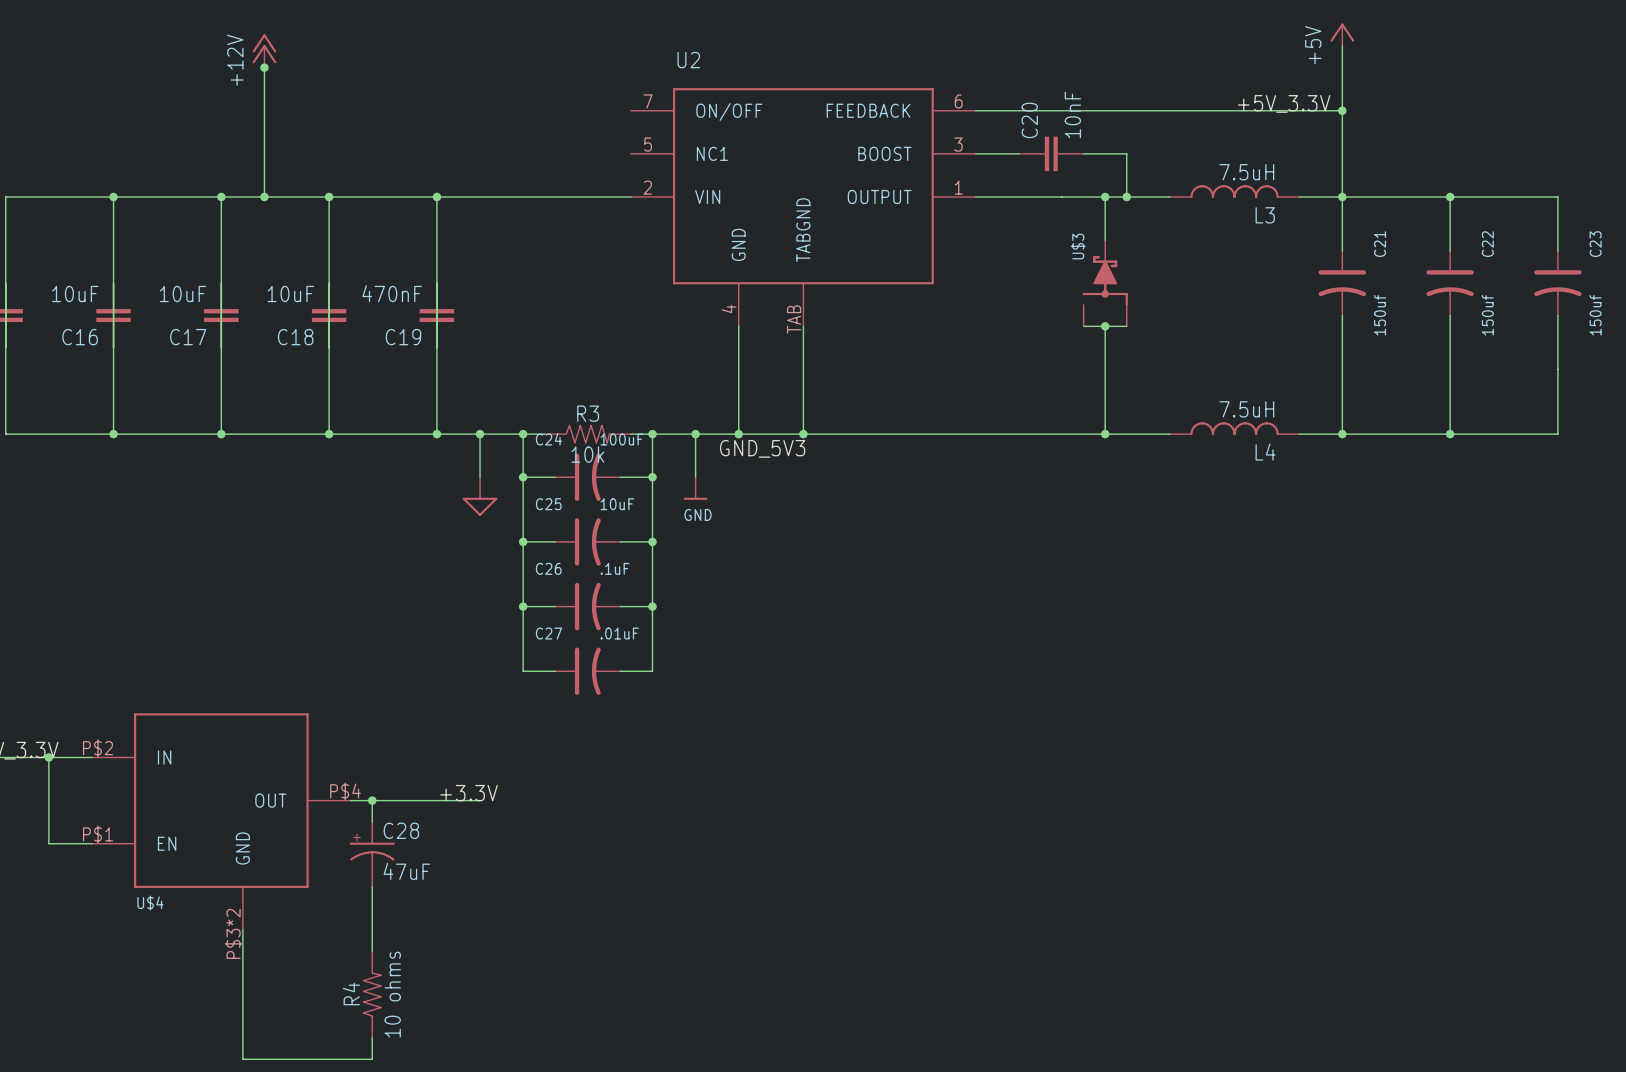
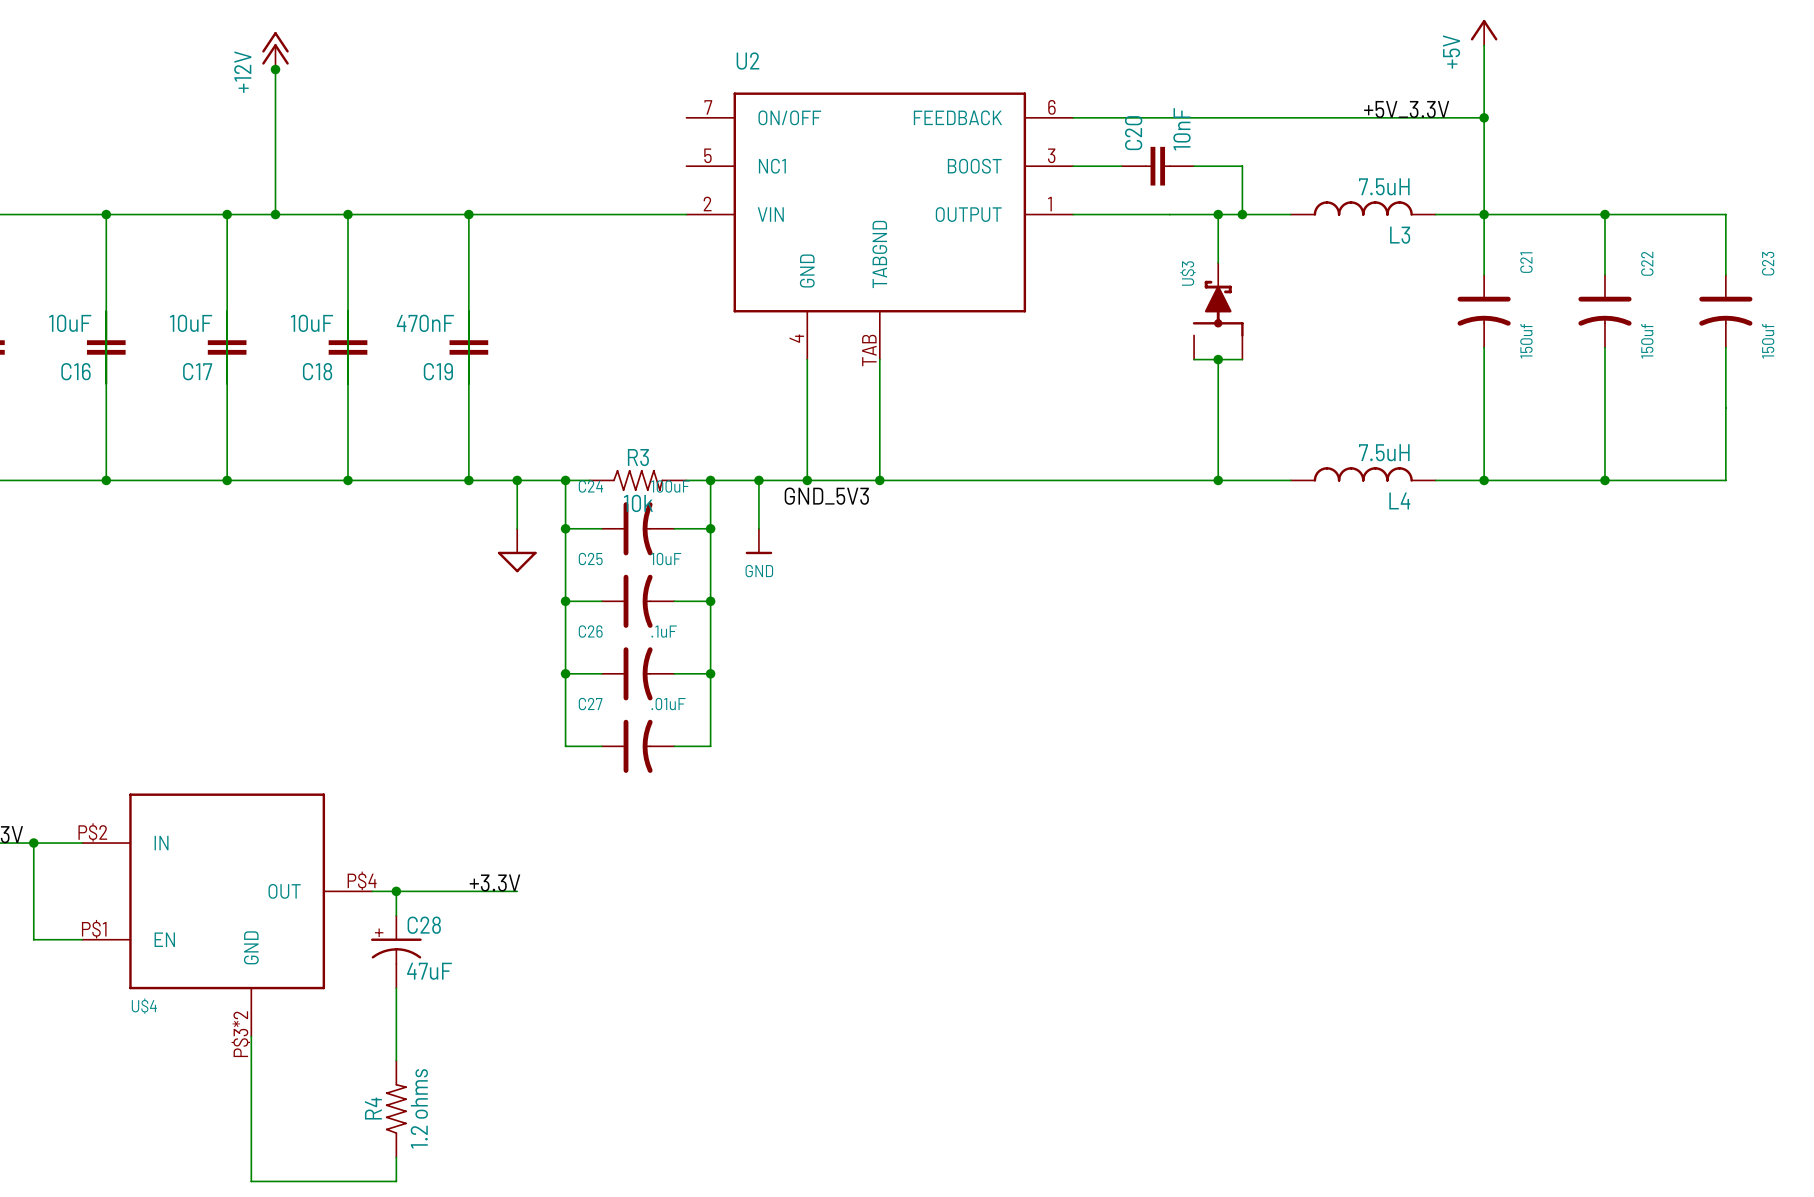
R4 value: 10 ohms (392, 994) -> 1.2 ohms (419, 1108)

